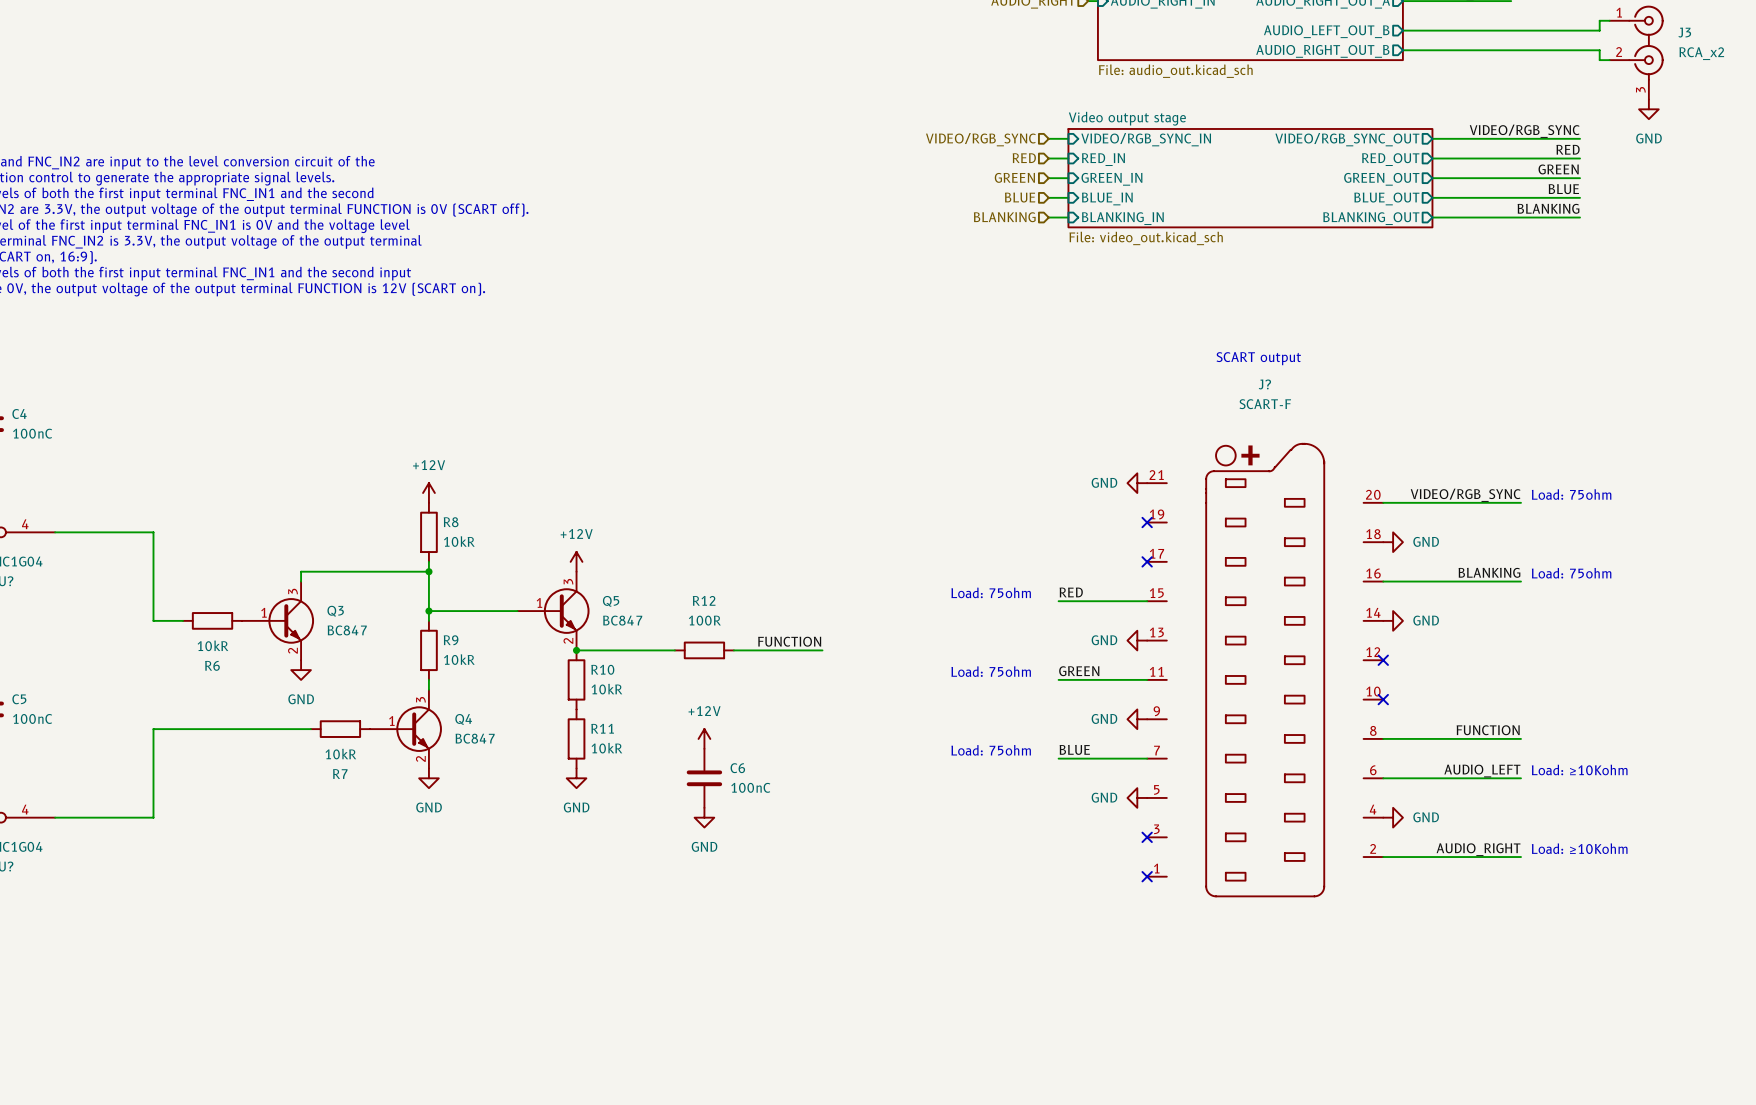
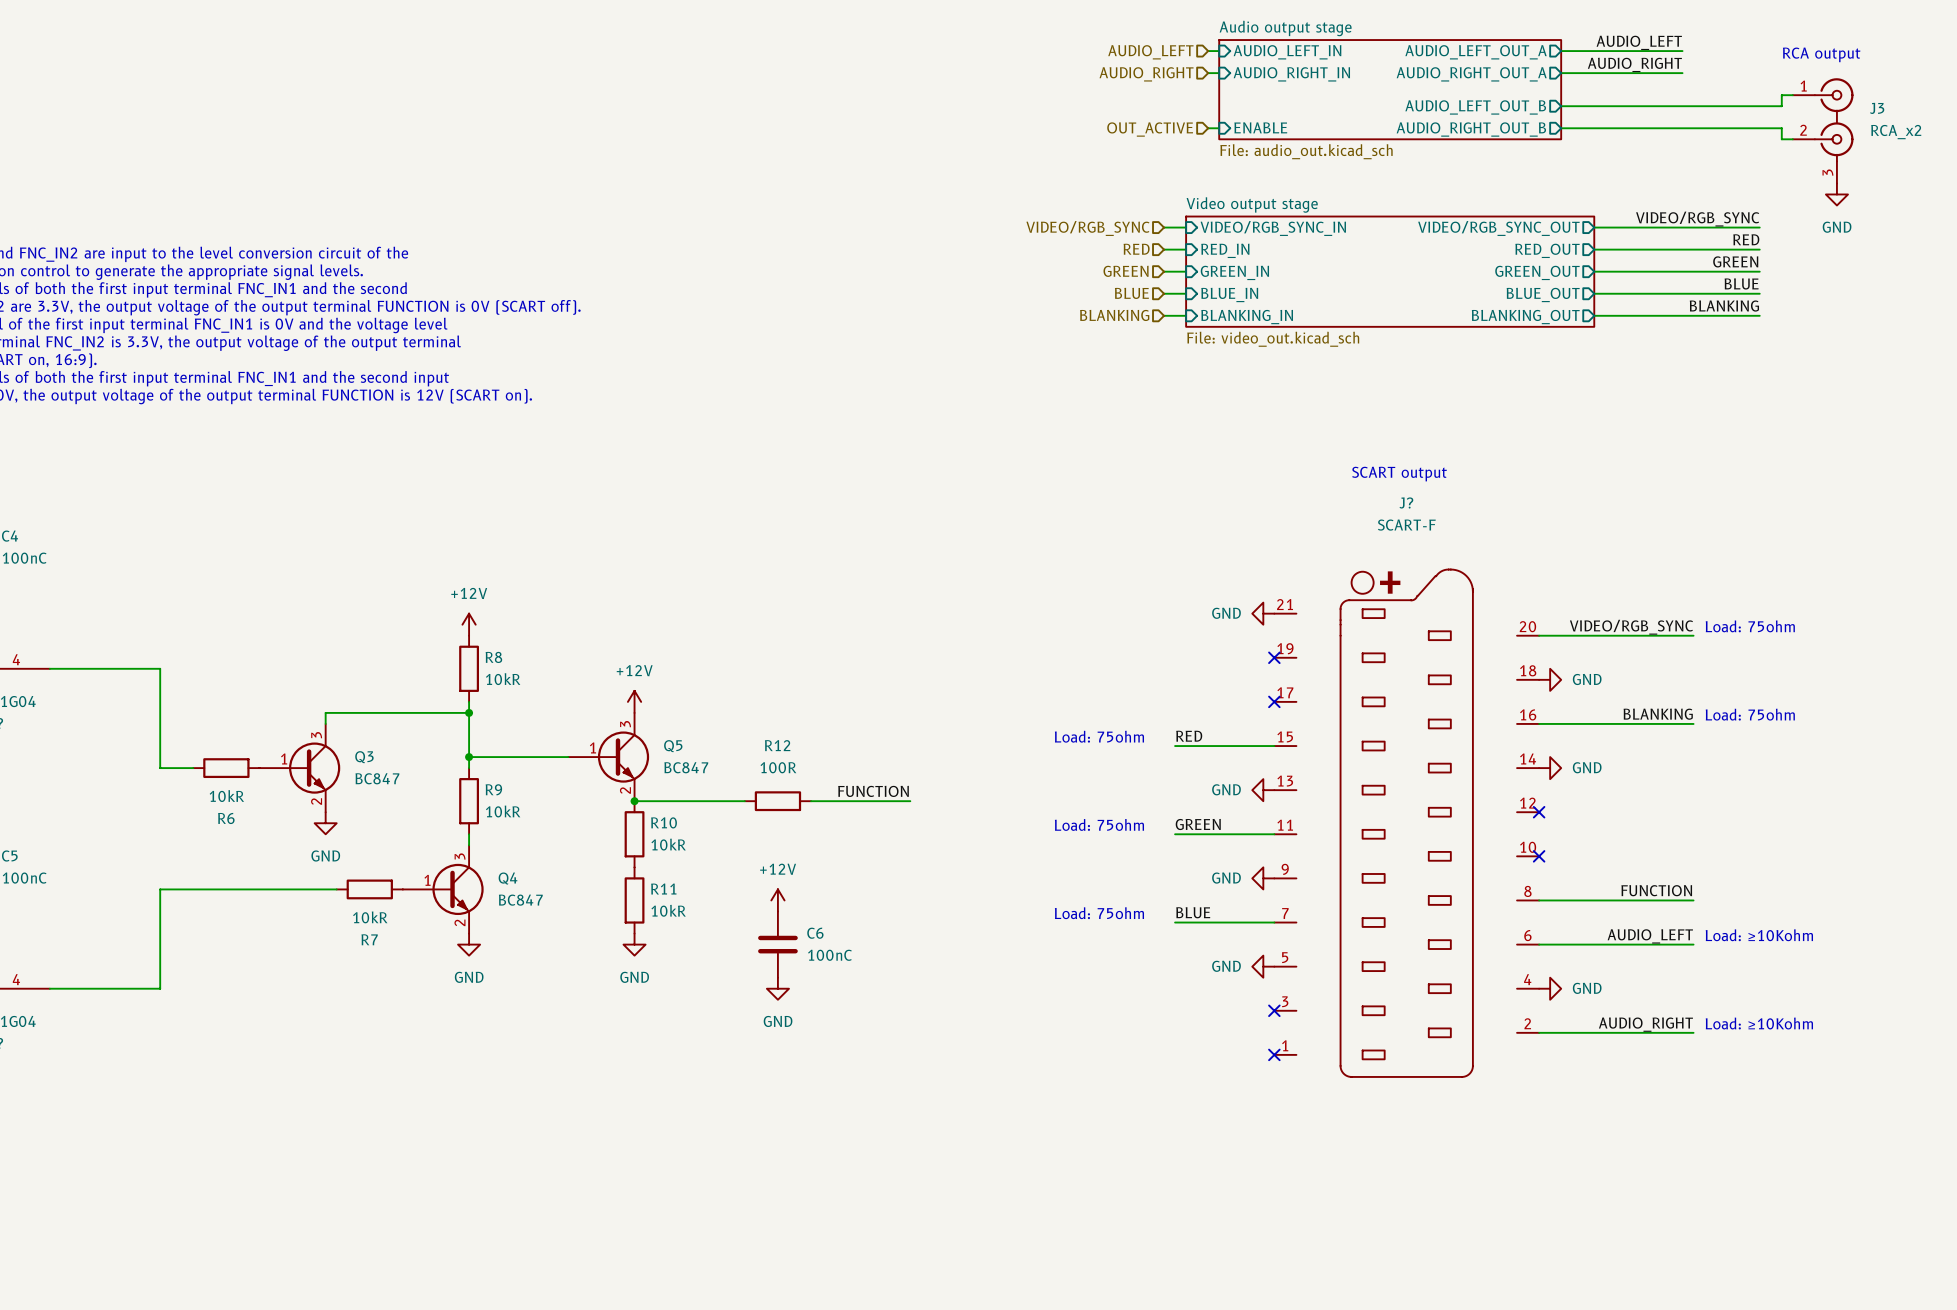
sheet pin: none -> ENABLE (1260, 127)
wire: none -> (1208, 128) (1219, 128)
hierarchical label: none -> OUT_ACTIVE (1150, 129)

